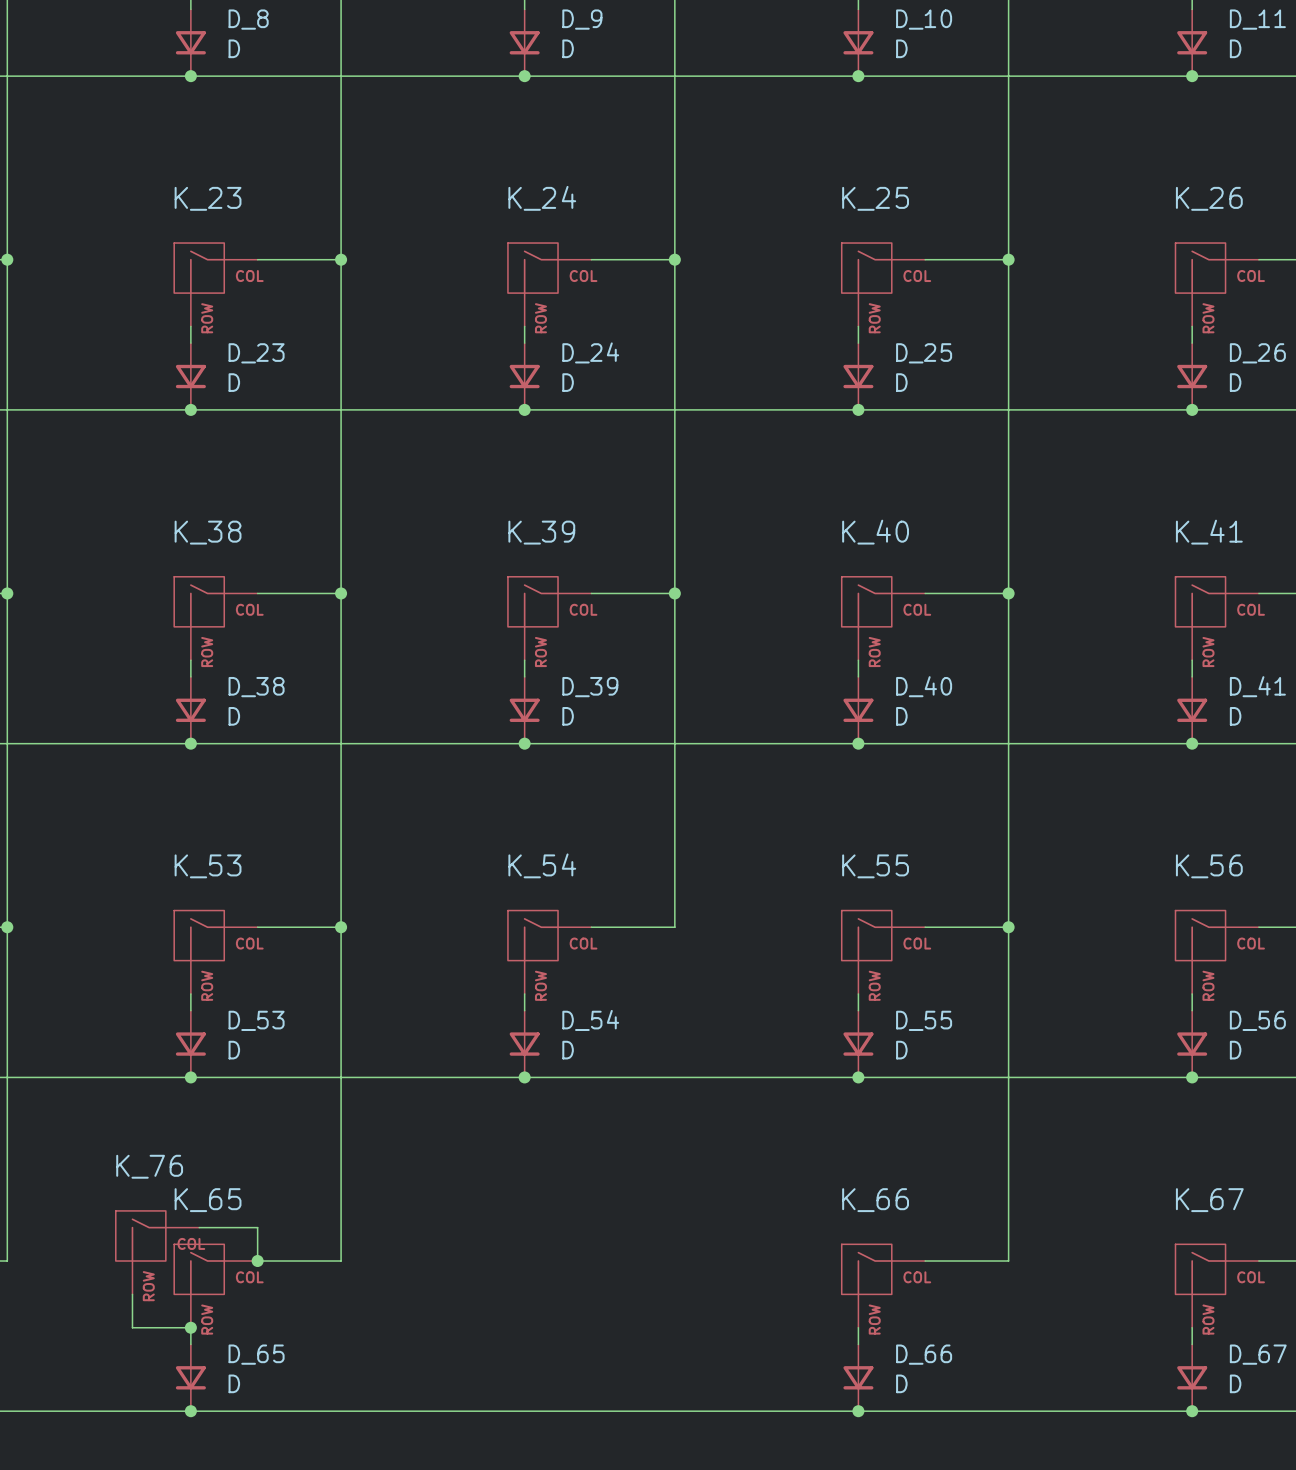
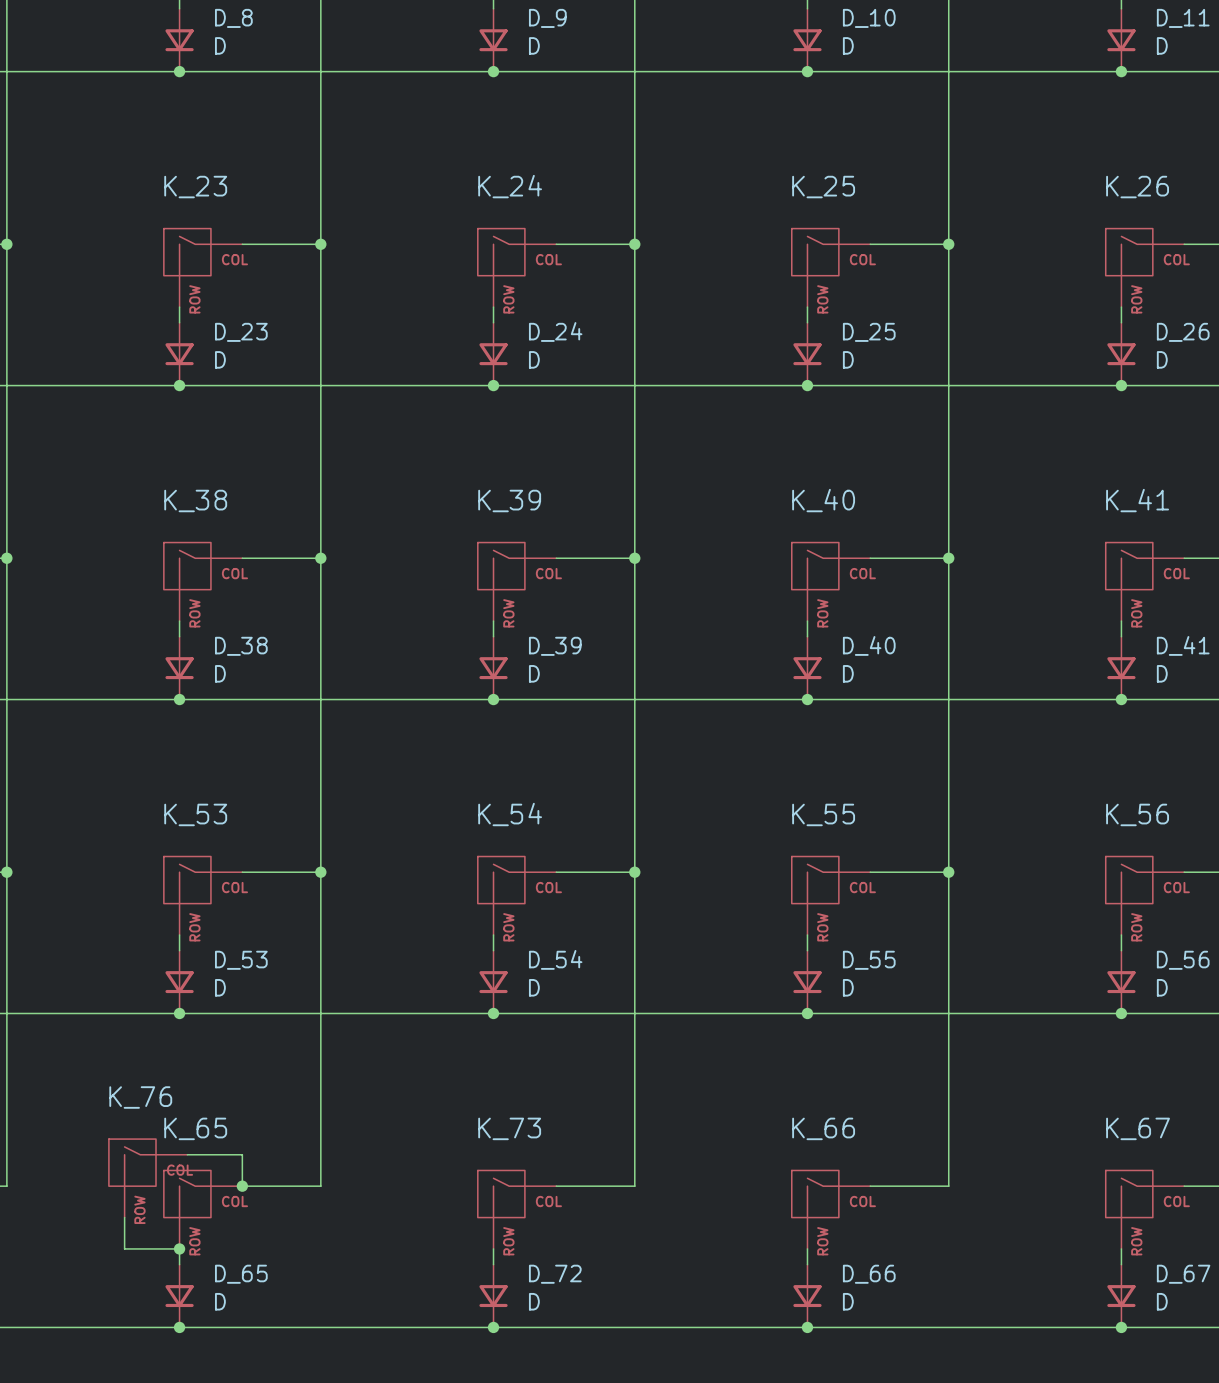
wire: none -> (634, 872) (634, 1186) (556, 1186)
junction: none -> (634, 872)
K_73: none -> (517, 1209)
wire: none -> (493, 1248) (493, 1264)
D_72: none -> D (493, 1296)
junction: none -> (493, 1327)

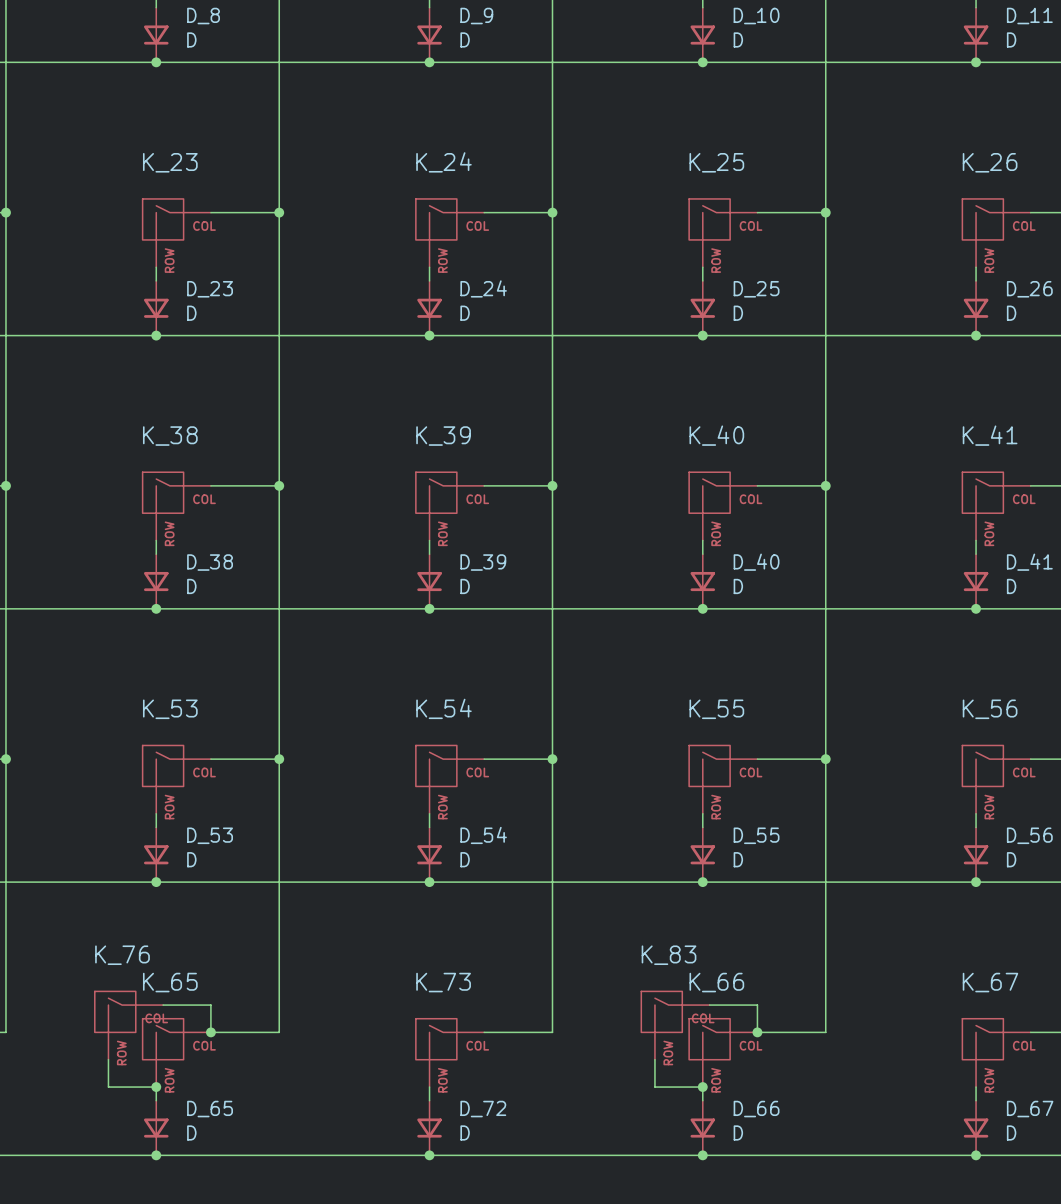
wire: none -> (709, 1005) (757, 1005) (757, 1032)
K_83: none -> (675, 1025)
junction: none -> (757, 1032)
wire: none -> (654, 1059) (654, 1087) (702, 1087)
junction: none -> (702, 1087)

